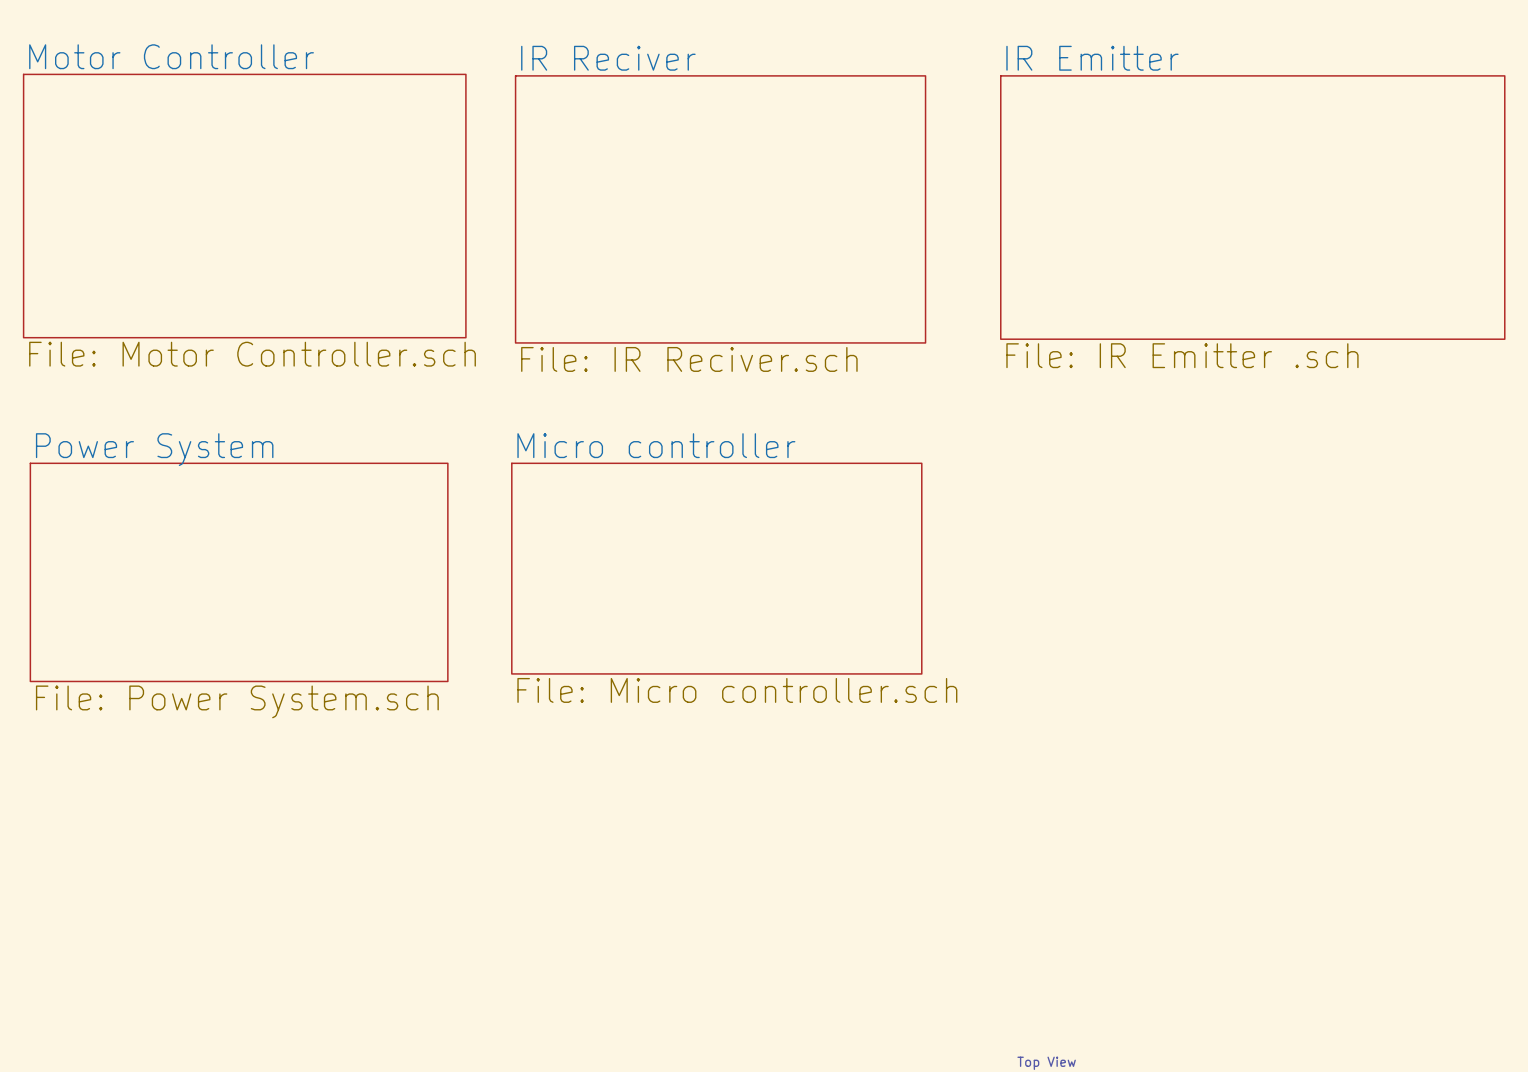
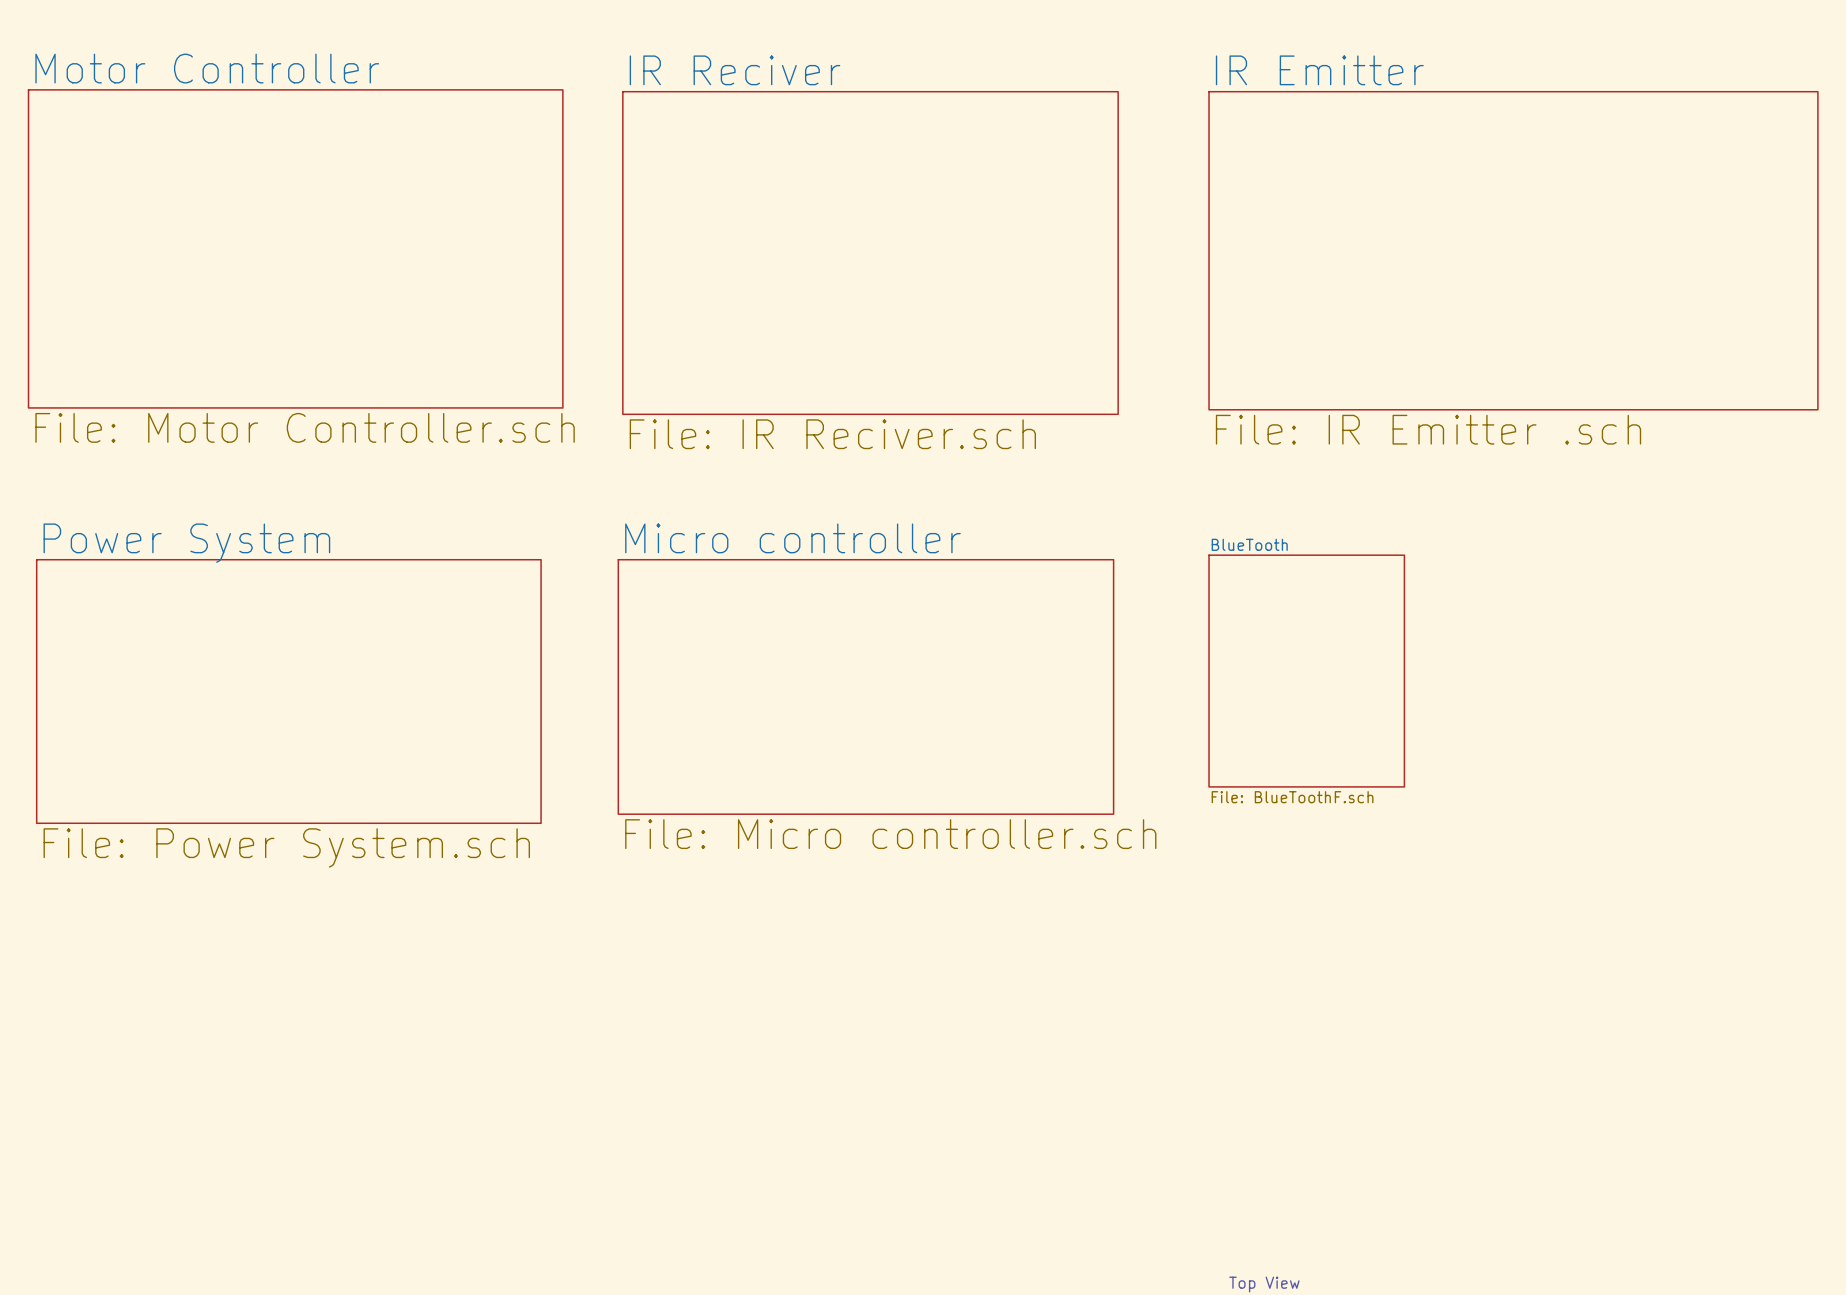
sheet BlueTooth: none -> File: BlueToothF.sch (1306, 671)

